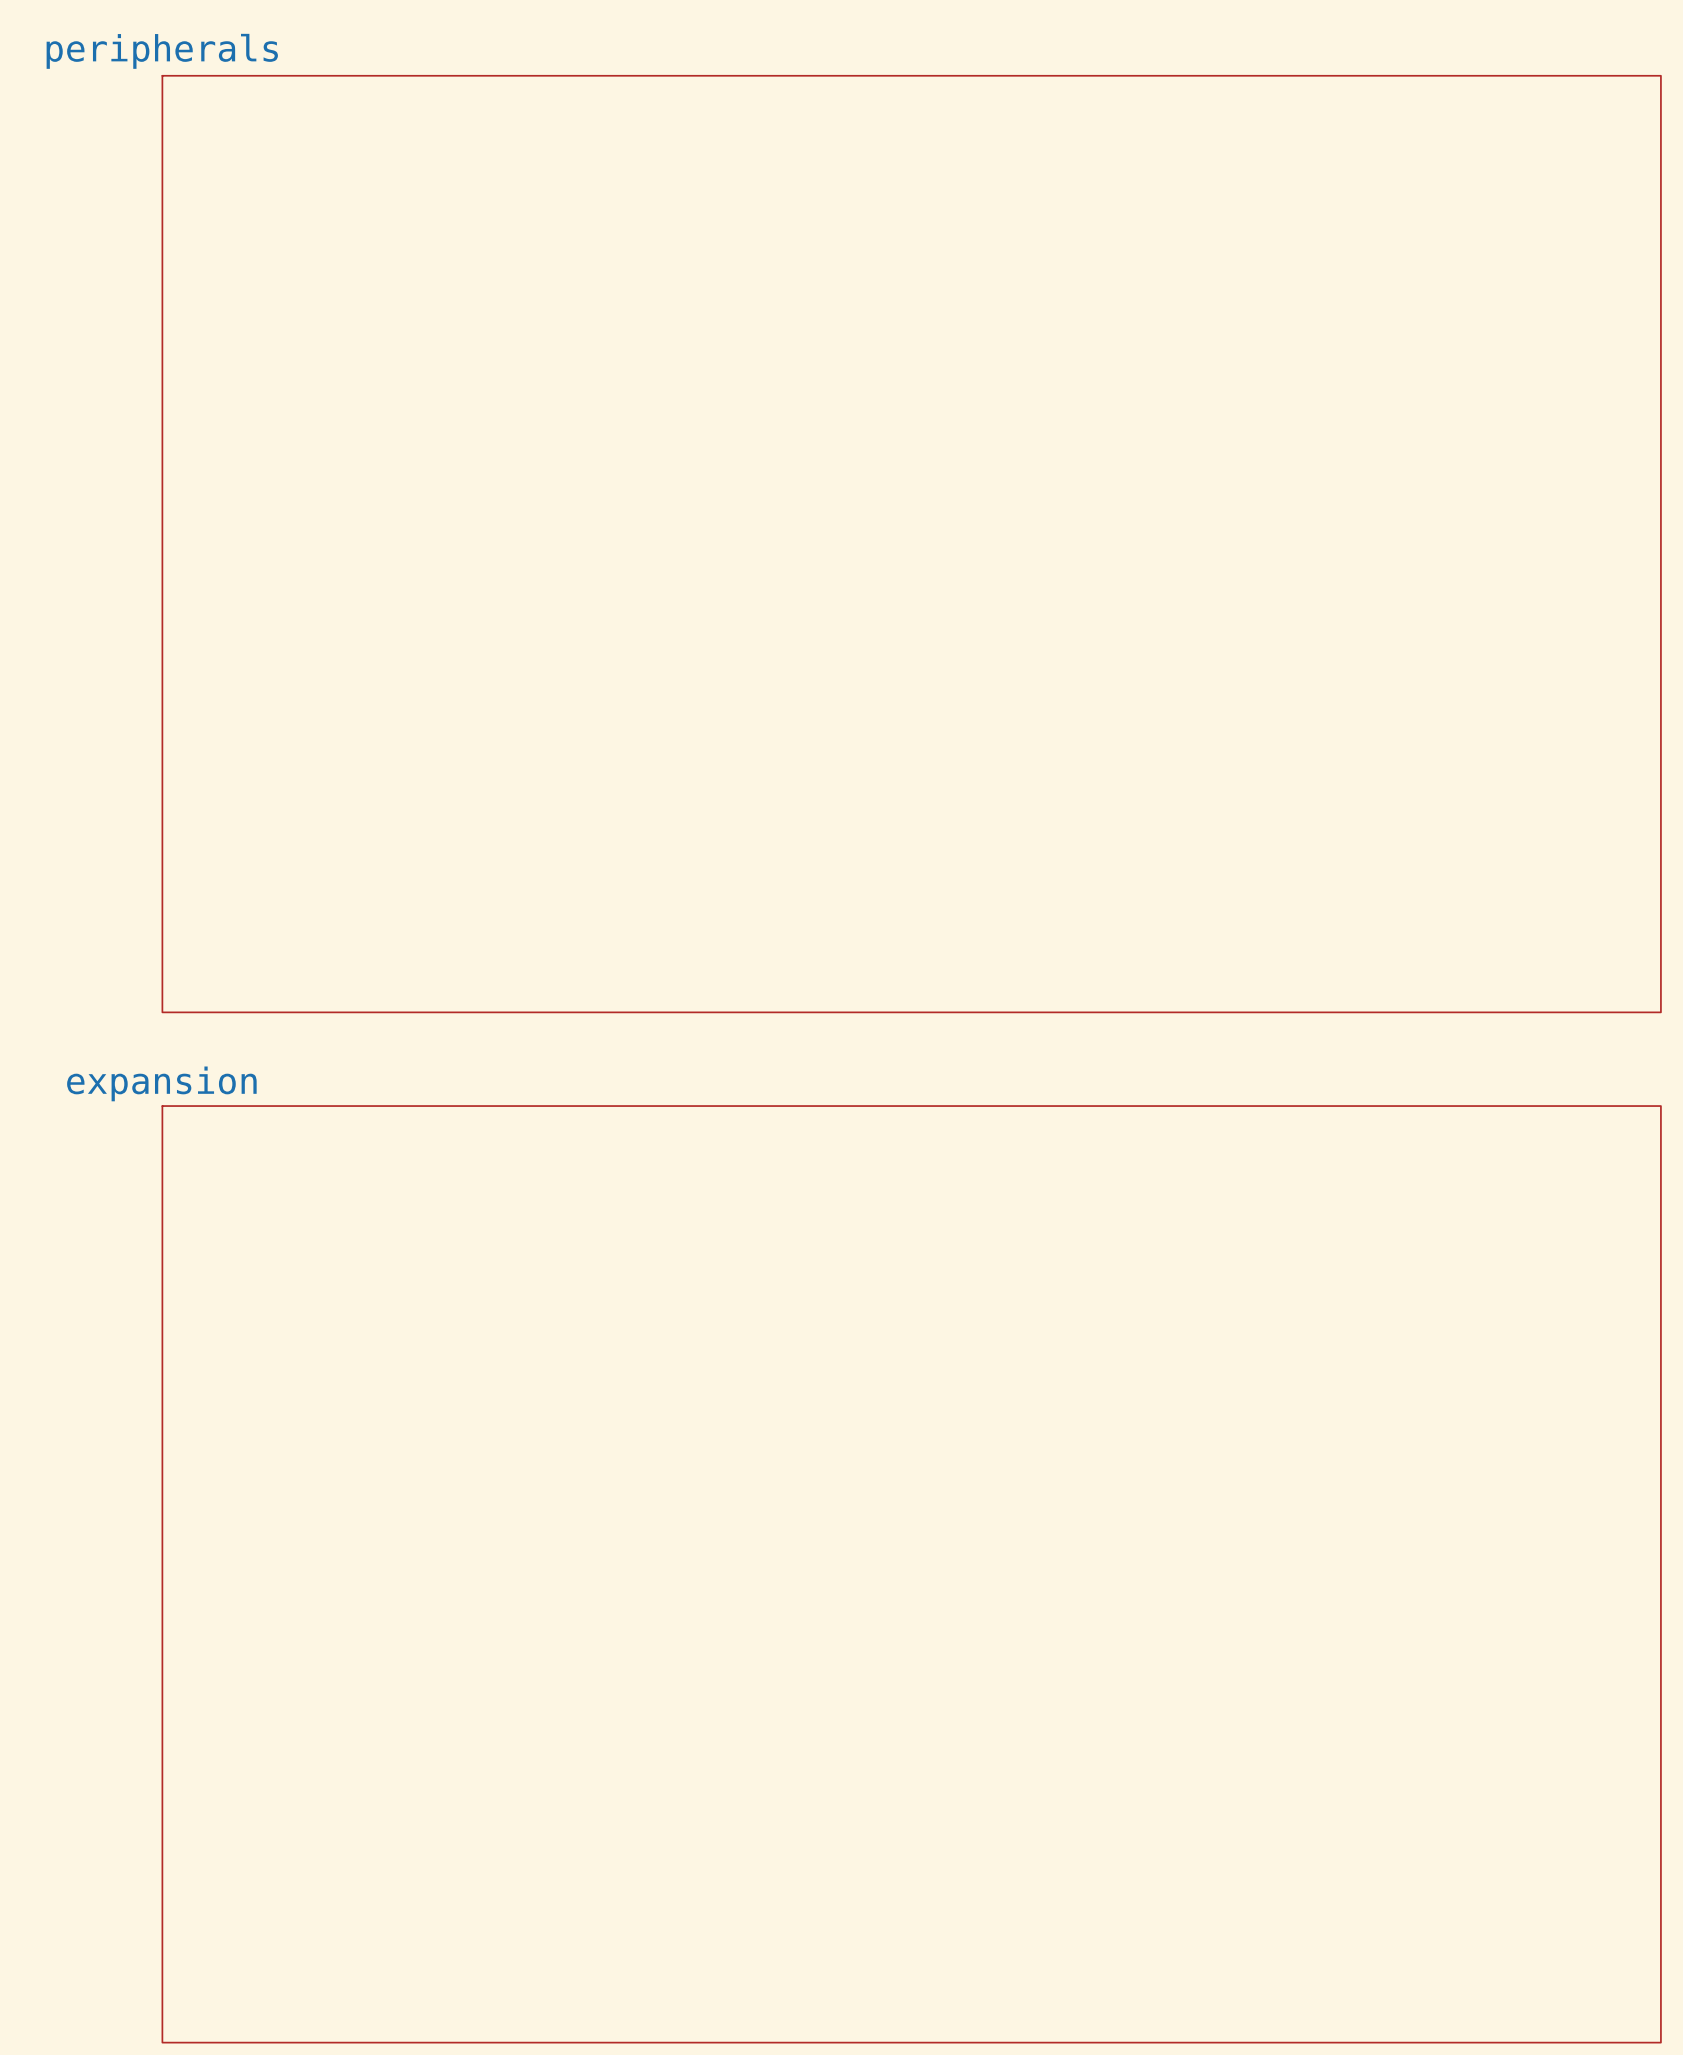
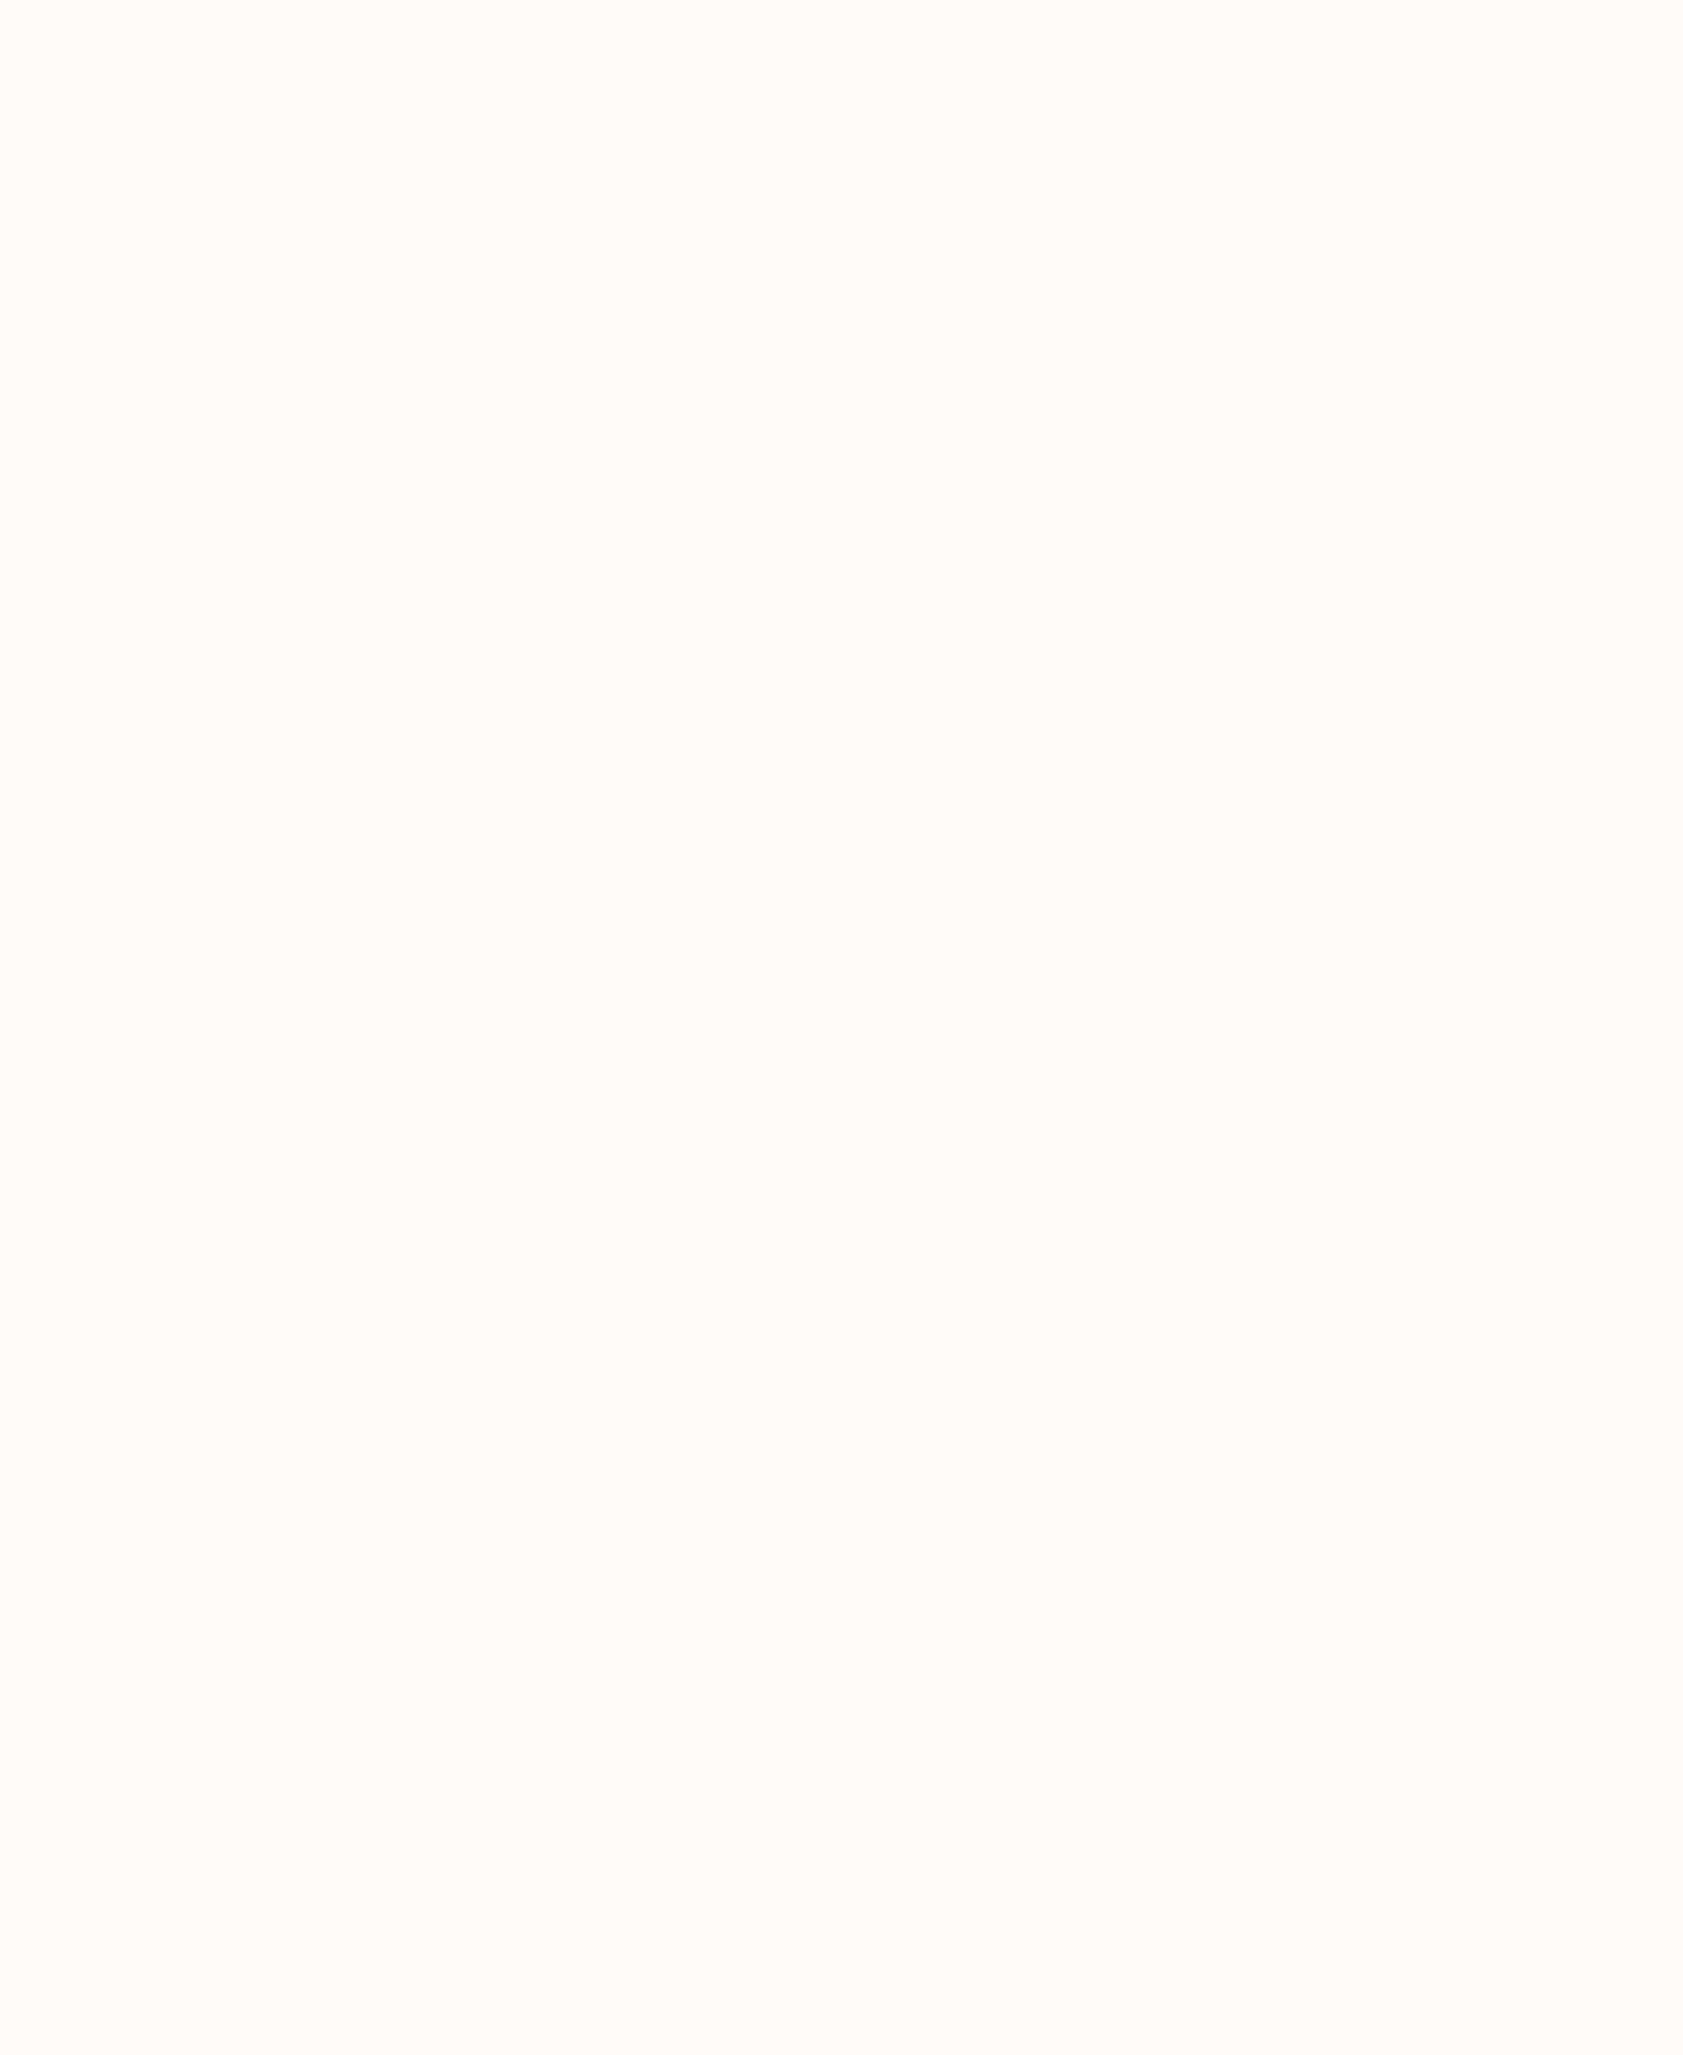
sheet peripherals: (911, 544) -> none
sheet expansion: (911, 1574) -> none

